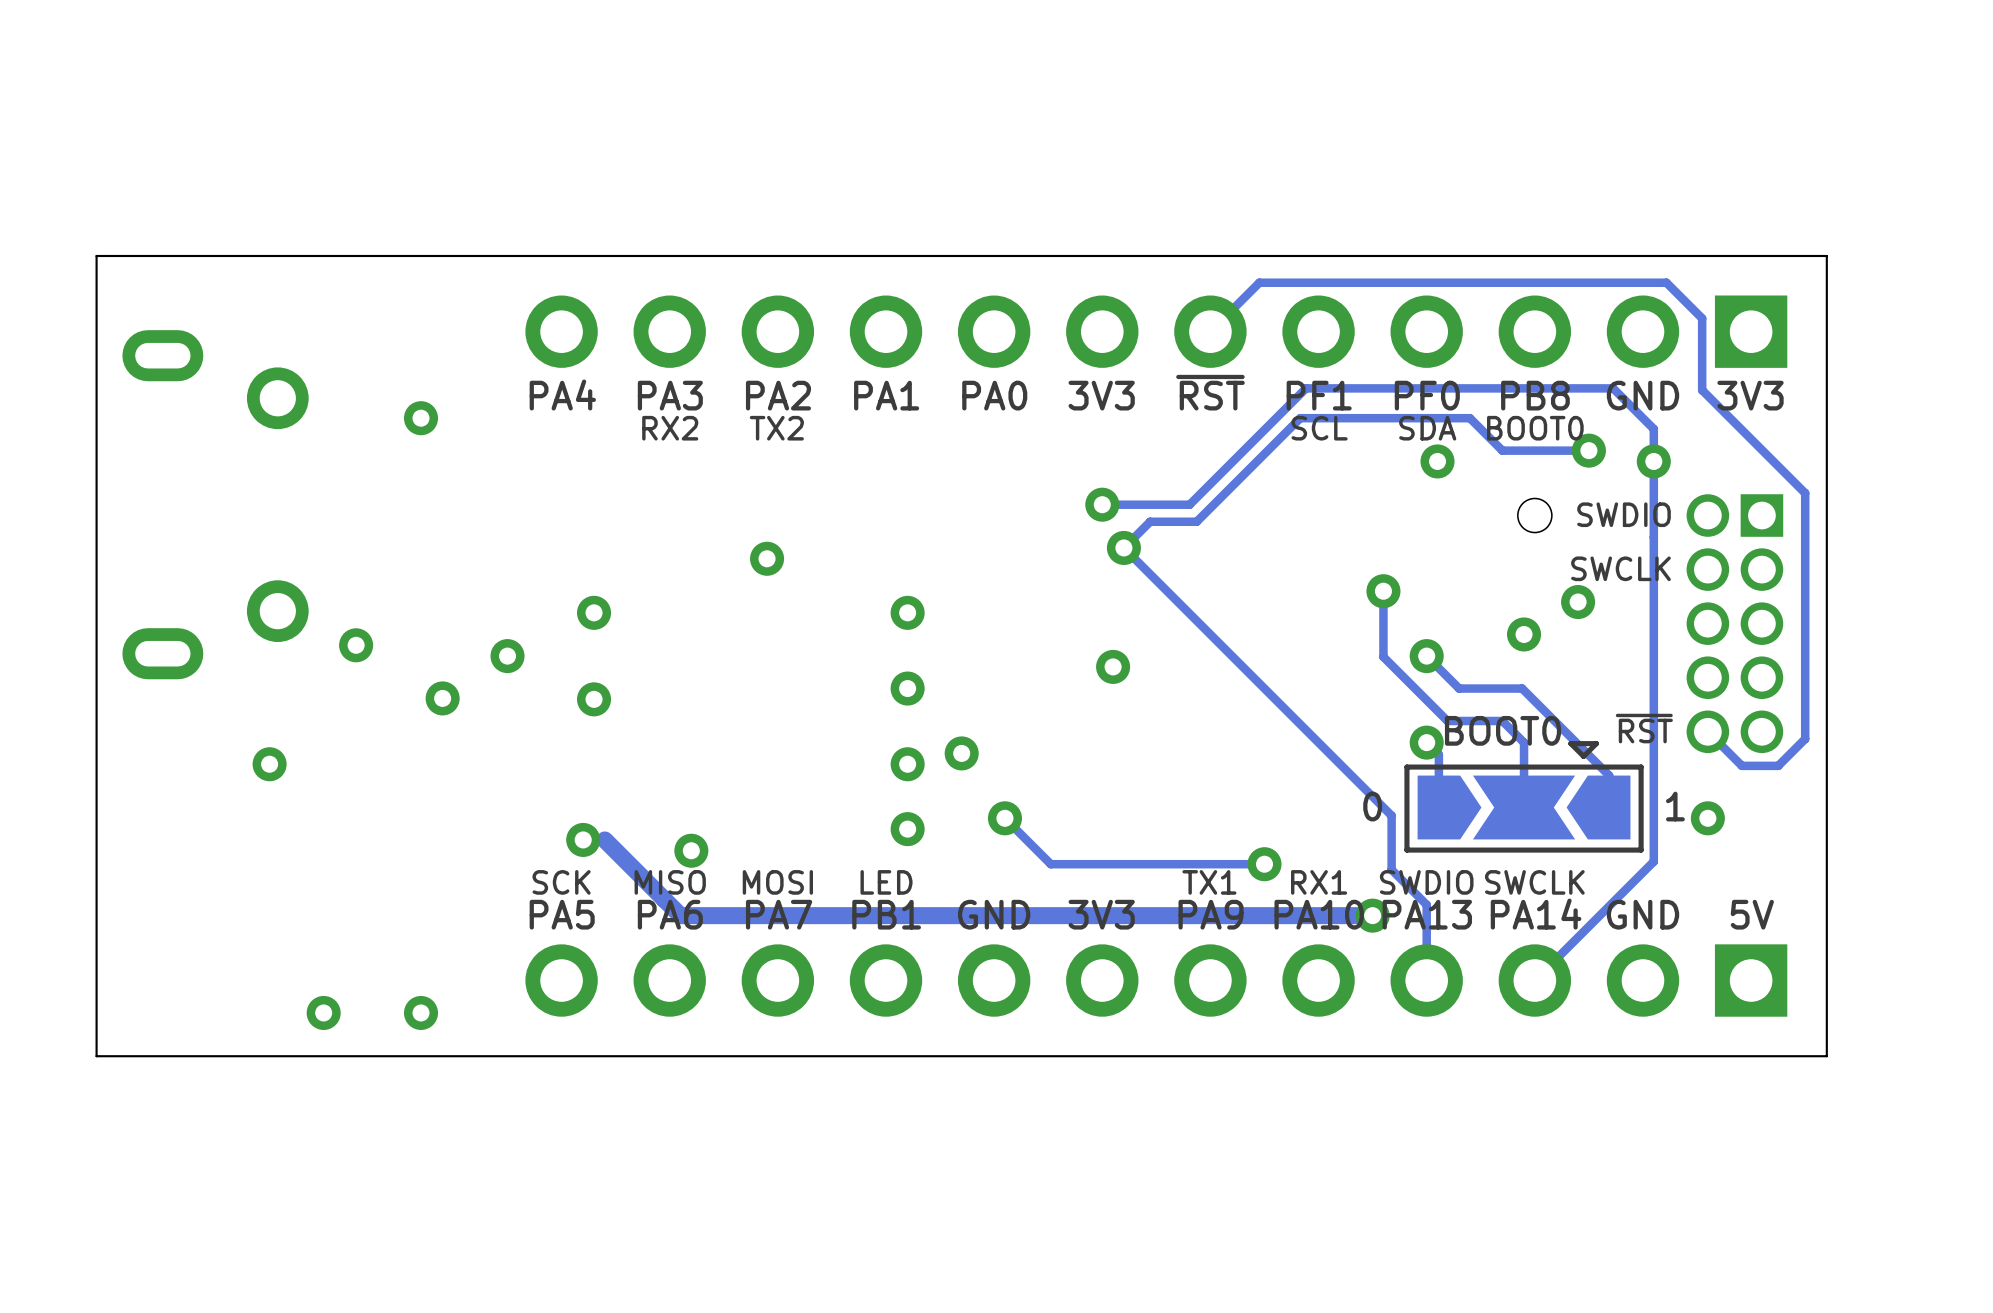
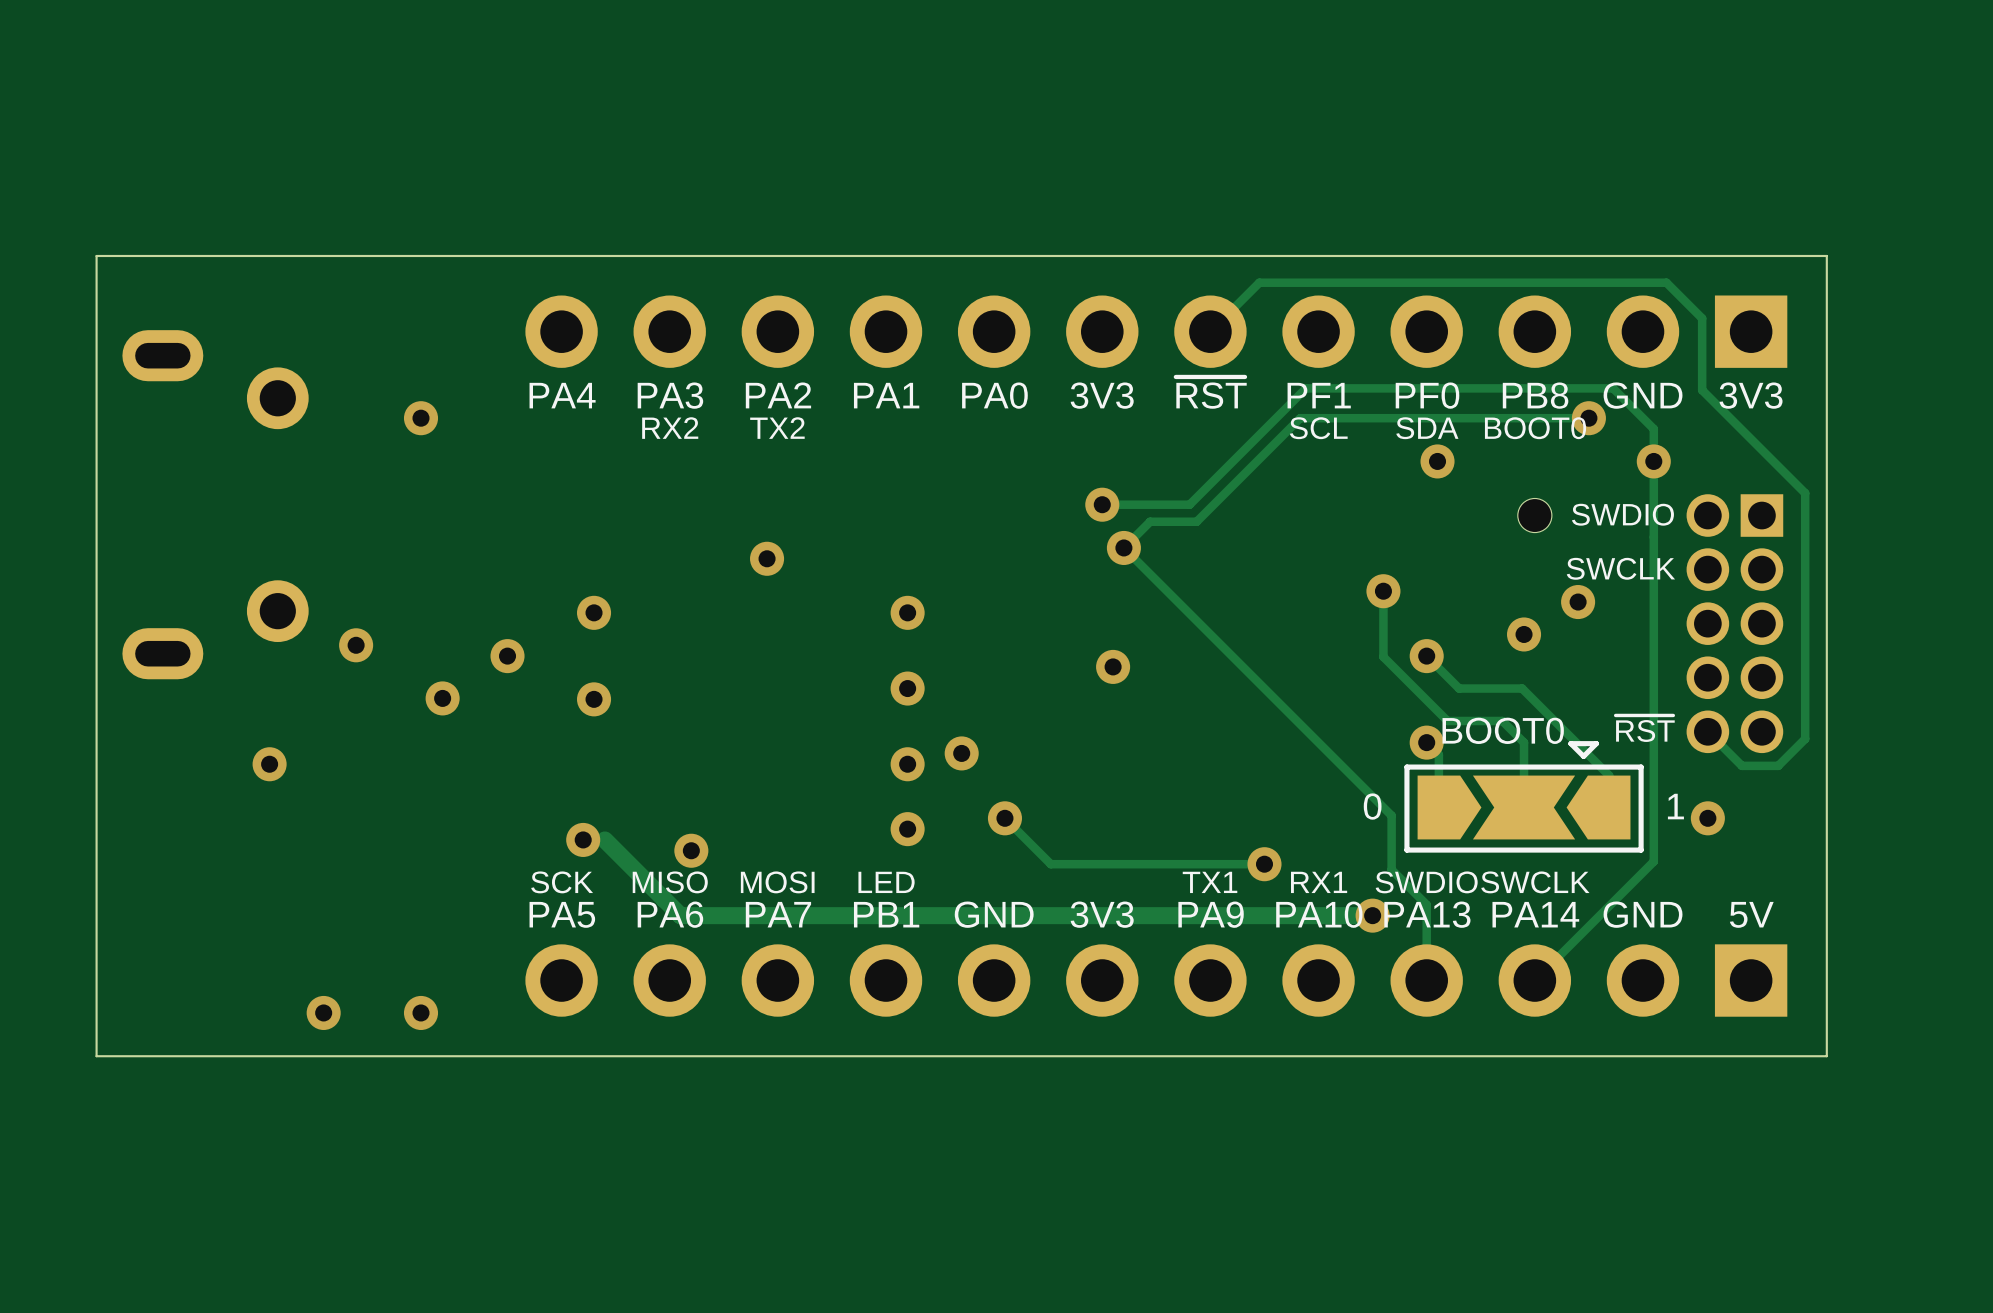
track: (1469, 418) (1502, 450) (1588, 450) -> (1469, 418) (1588, 418)
via position: (1588, 450) -> (1588, 418)

